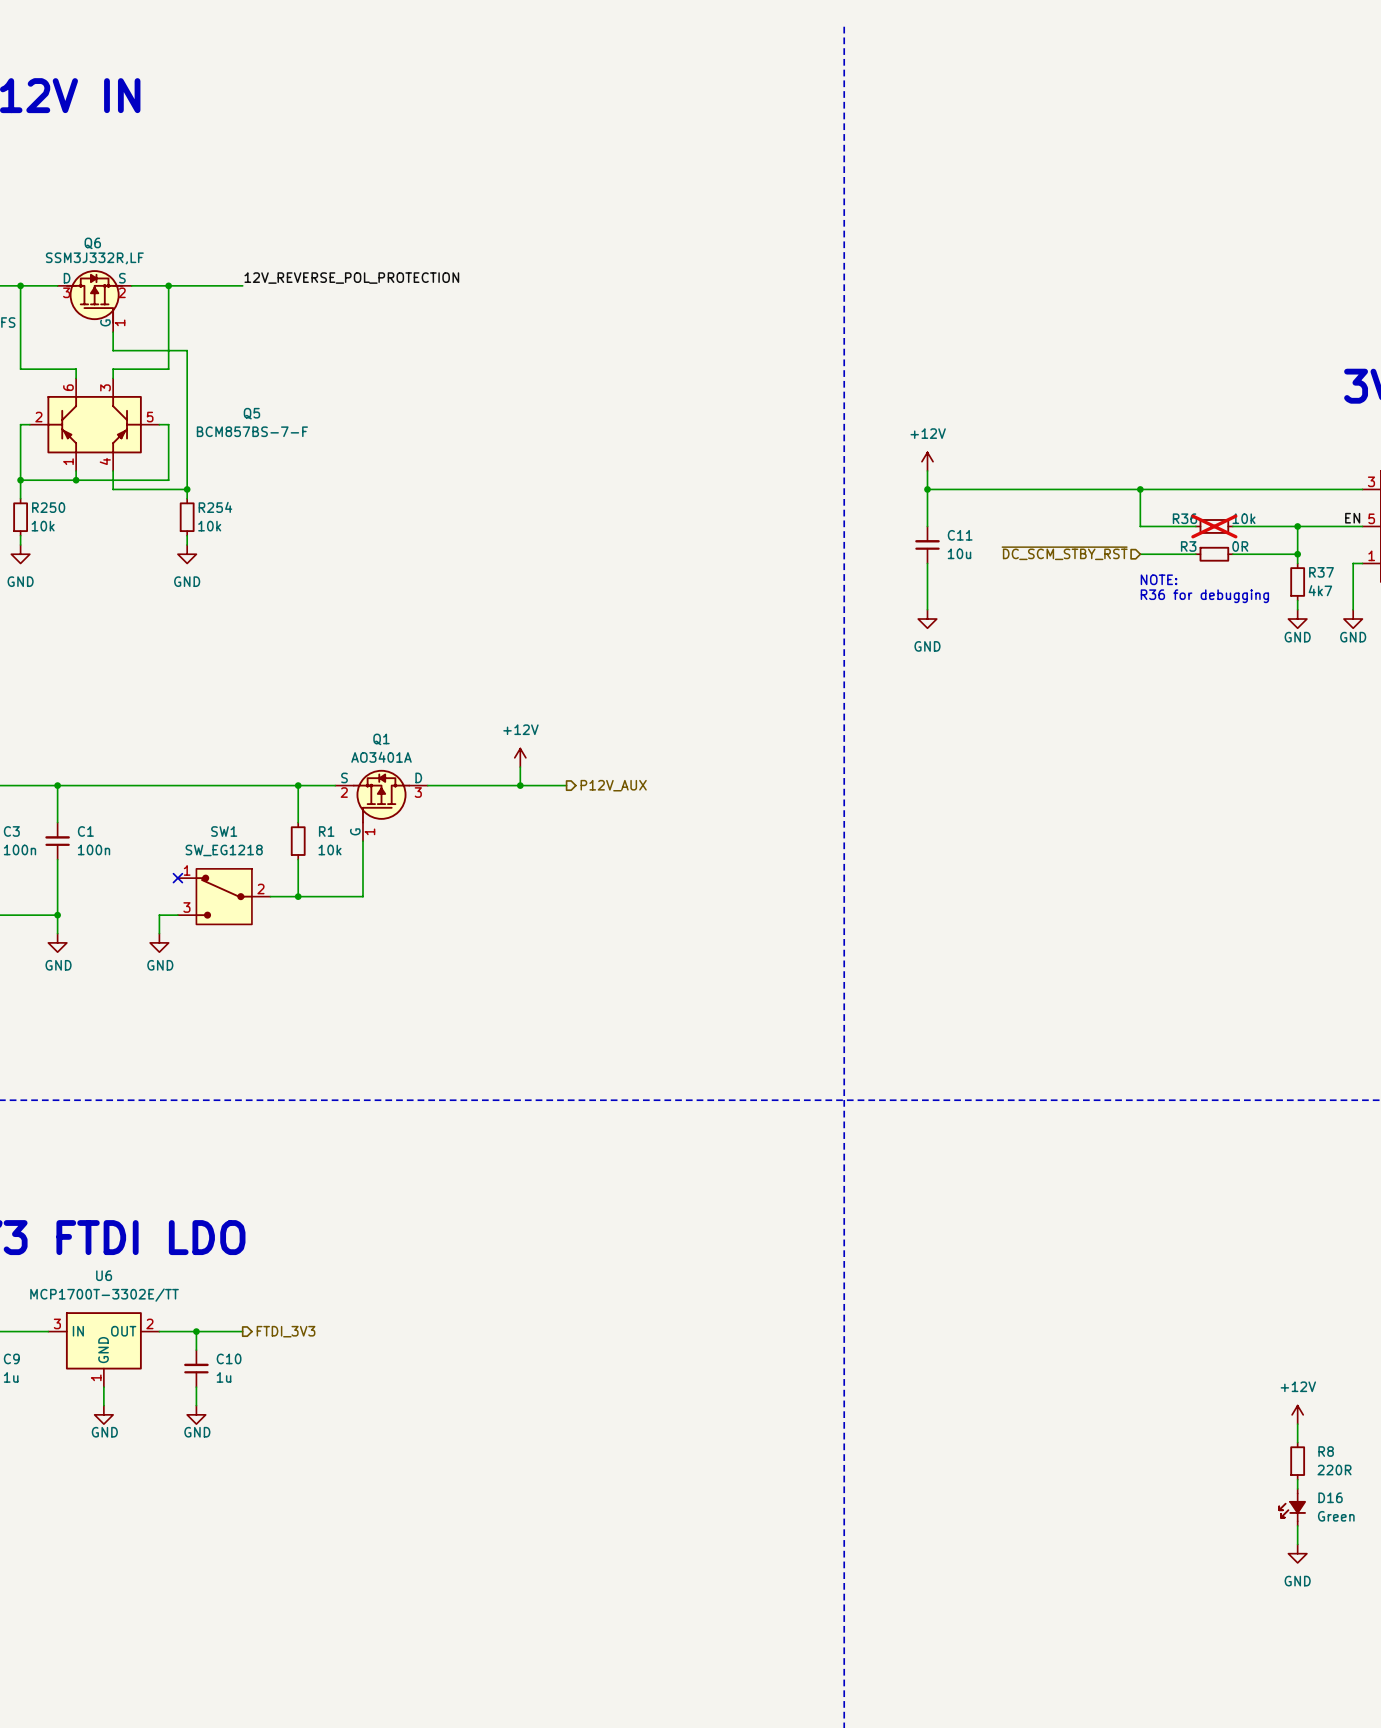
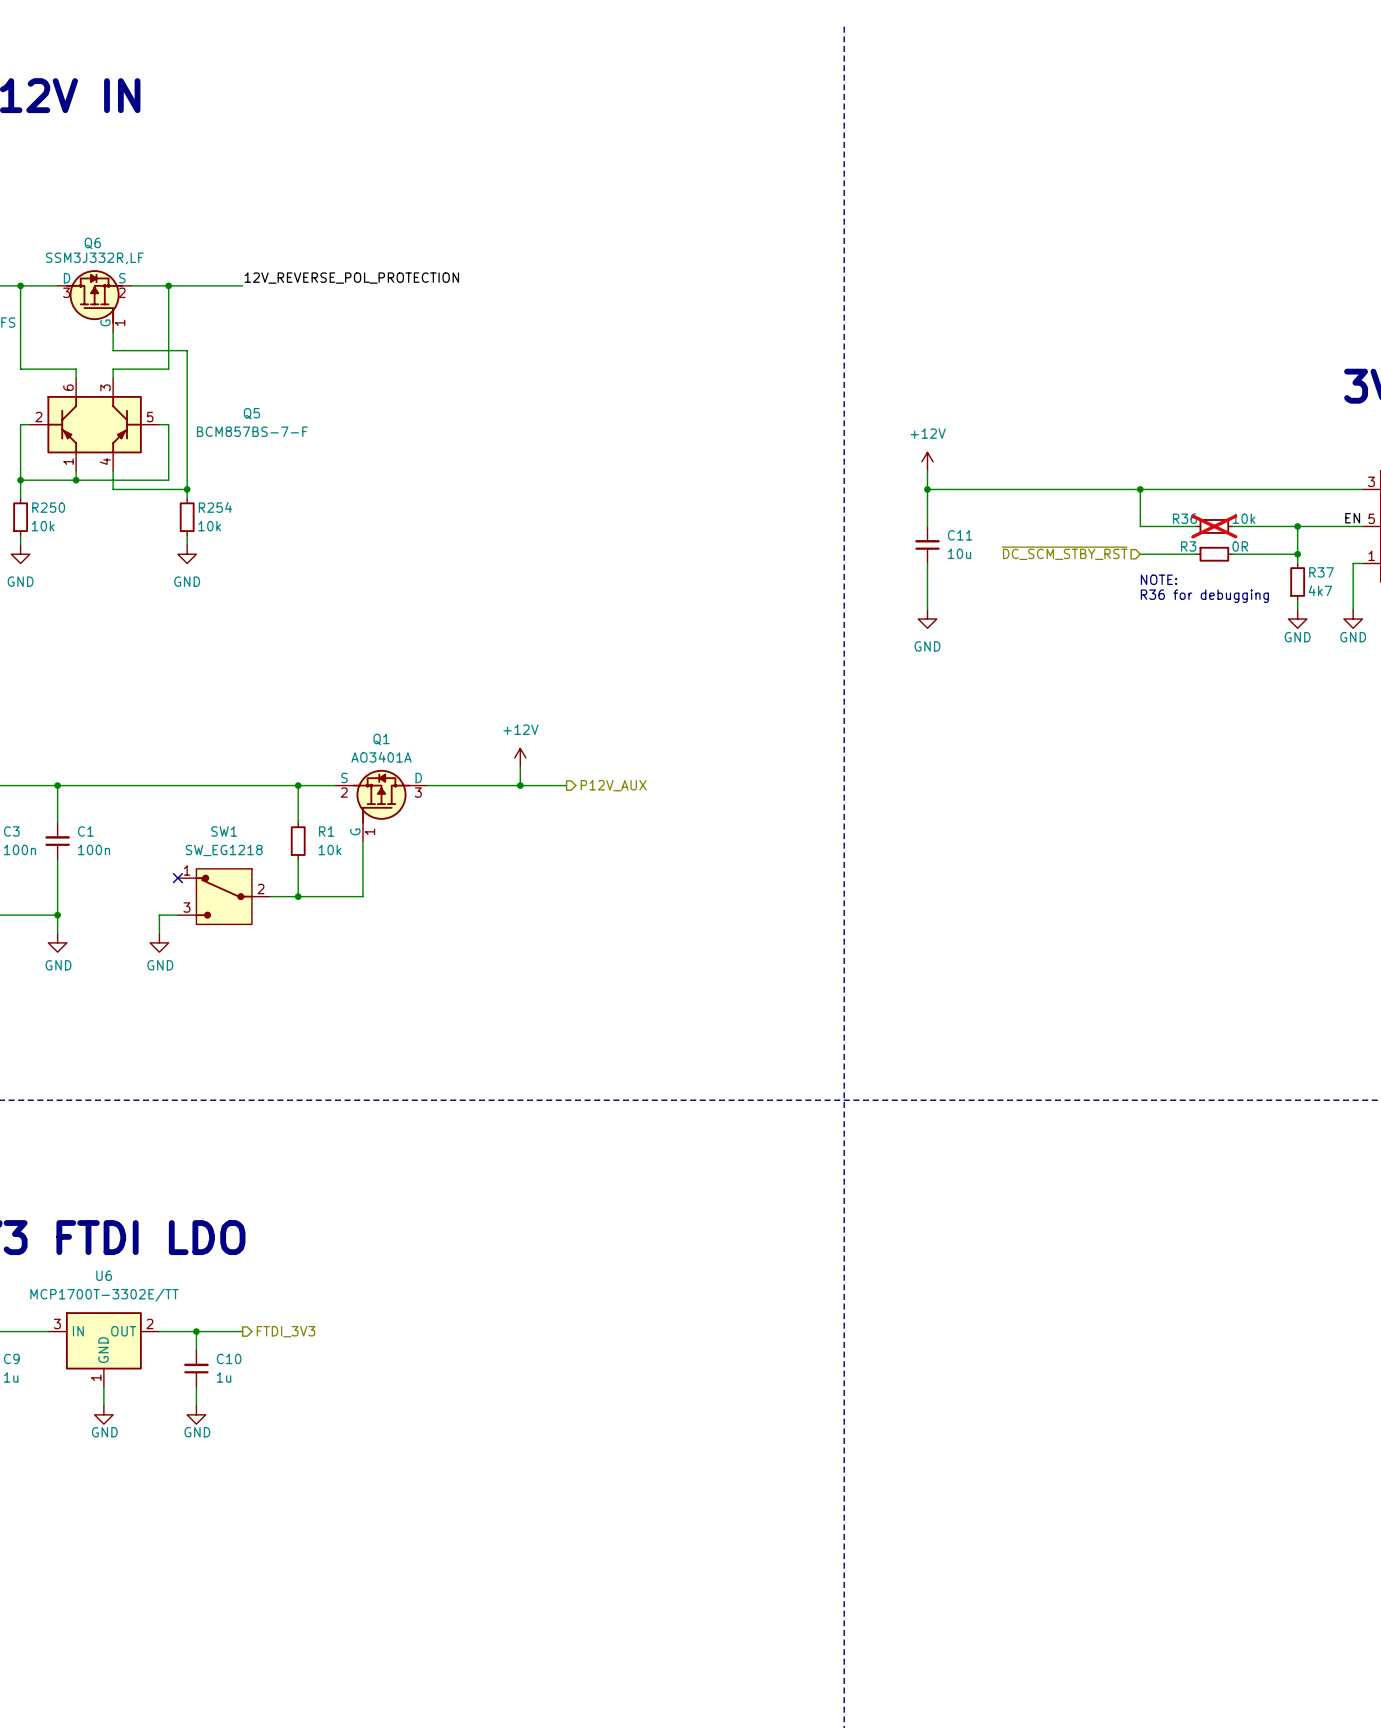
power symbol: +12V (1297, 1414) -> none
wire: (1297, 1424) (1297, 1442) -> none
R8: (1297, 1461) -> none
wire: (1297, 1479) (1297, 1488) -> none
D16: (1292, 1507) -> none
wire: (1297, 1525) (1297, 1544) -> none
power symbol: GND (1297, 1553) -> none

